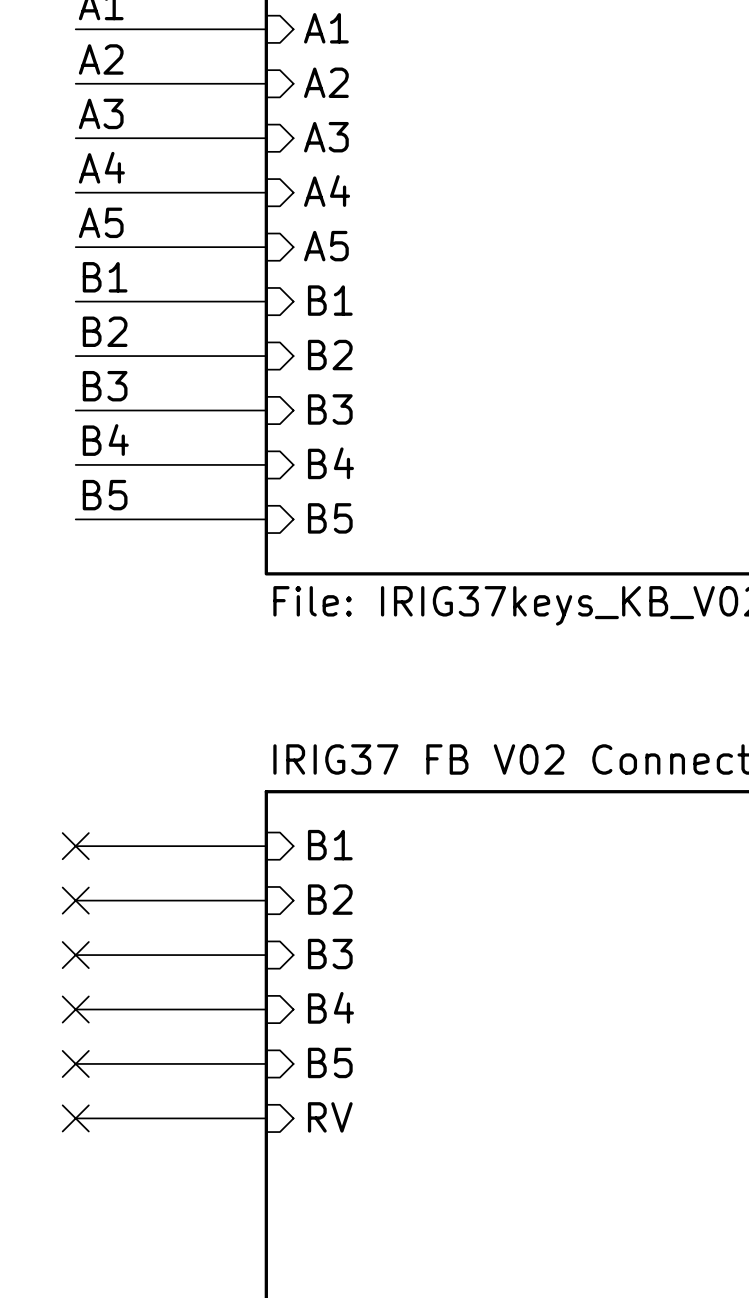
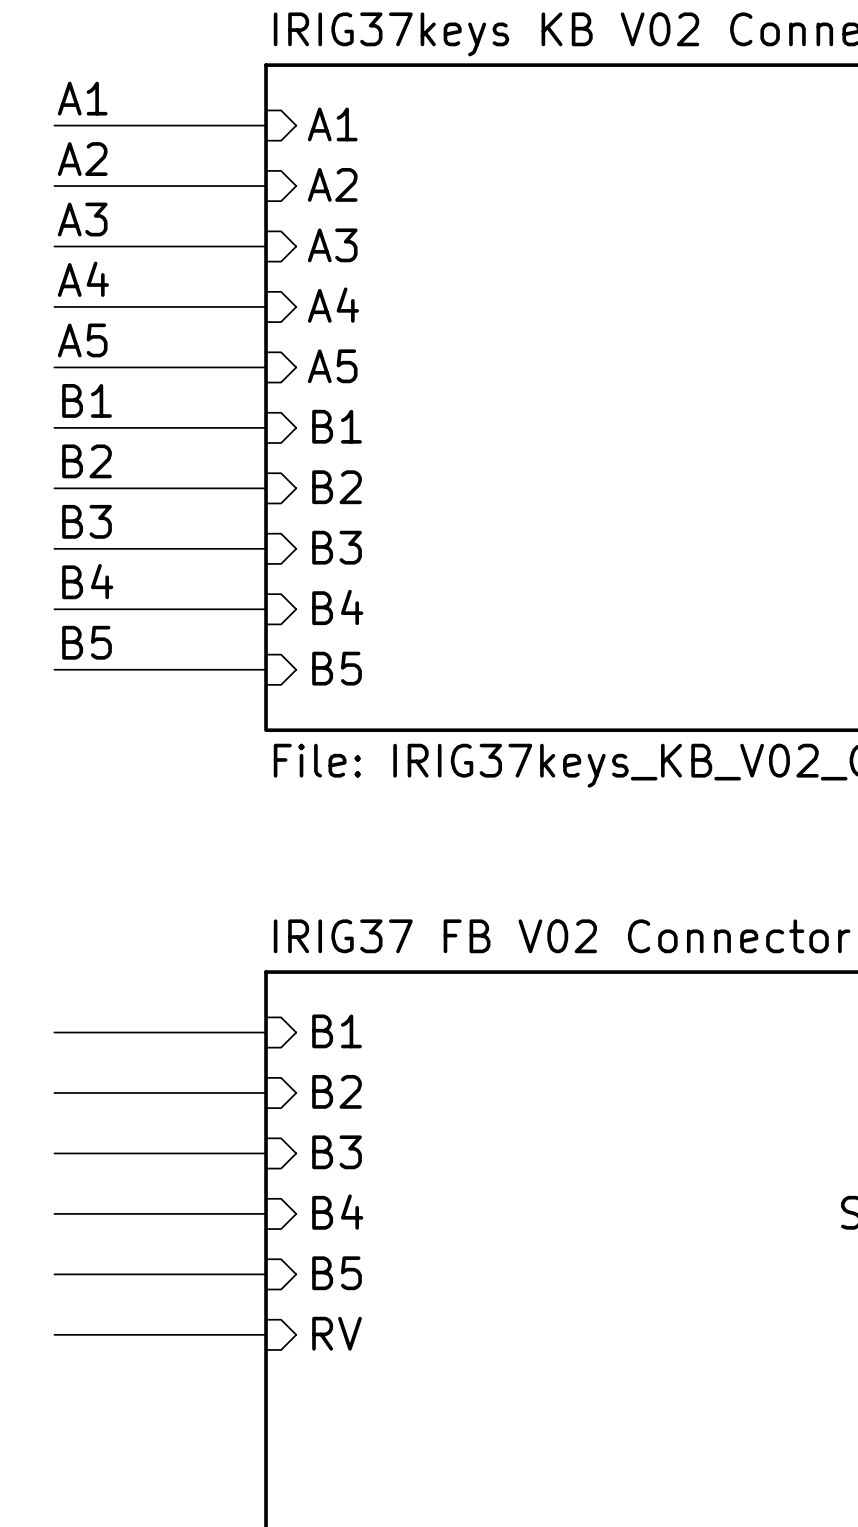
no-connect mark: (75, 846) -> none
no-connect mark: (75, 900) -> none
no-connect mark: (75, 955) -> none
no-connect mark: (75, 1009) -> none
no-connect mark: (75, 1063) -> none
no-connect mark: (75, 1118) -> none

